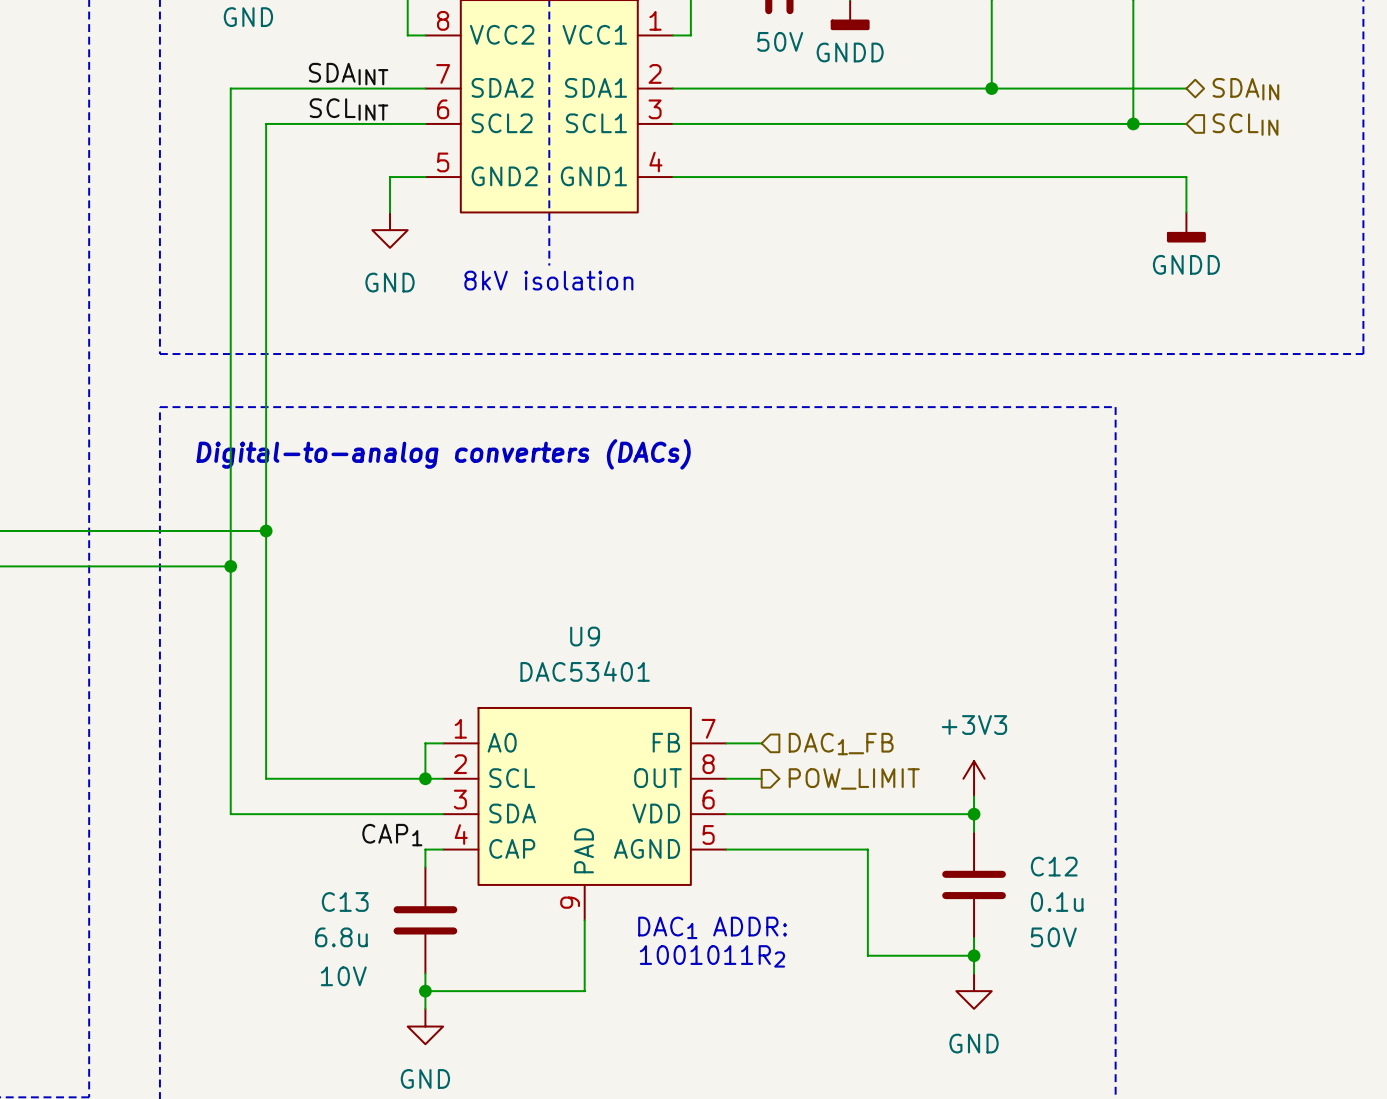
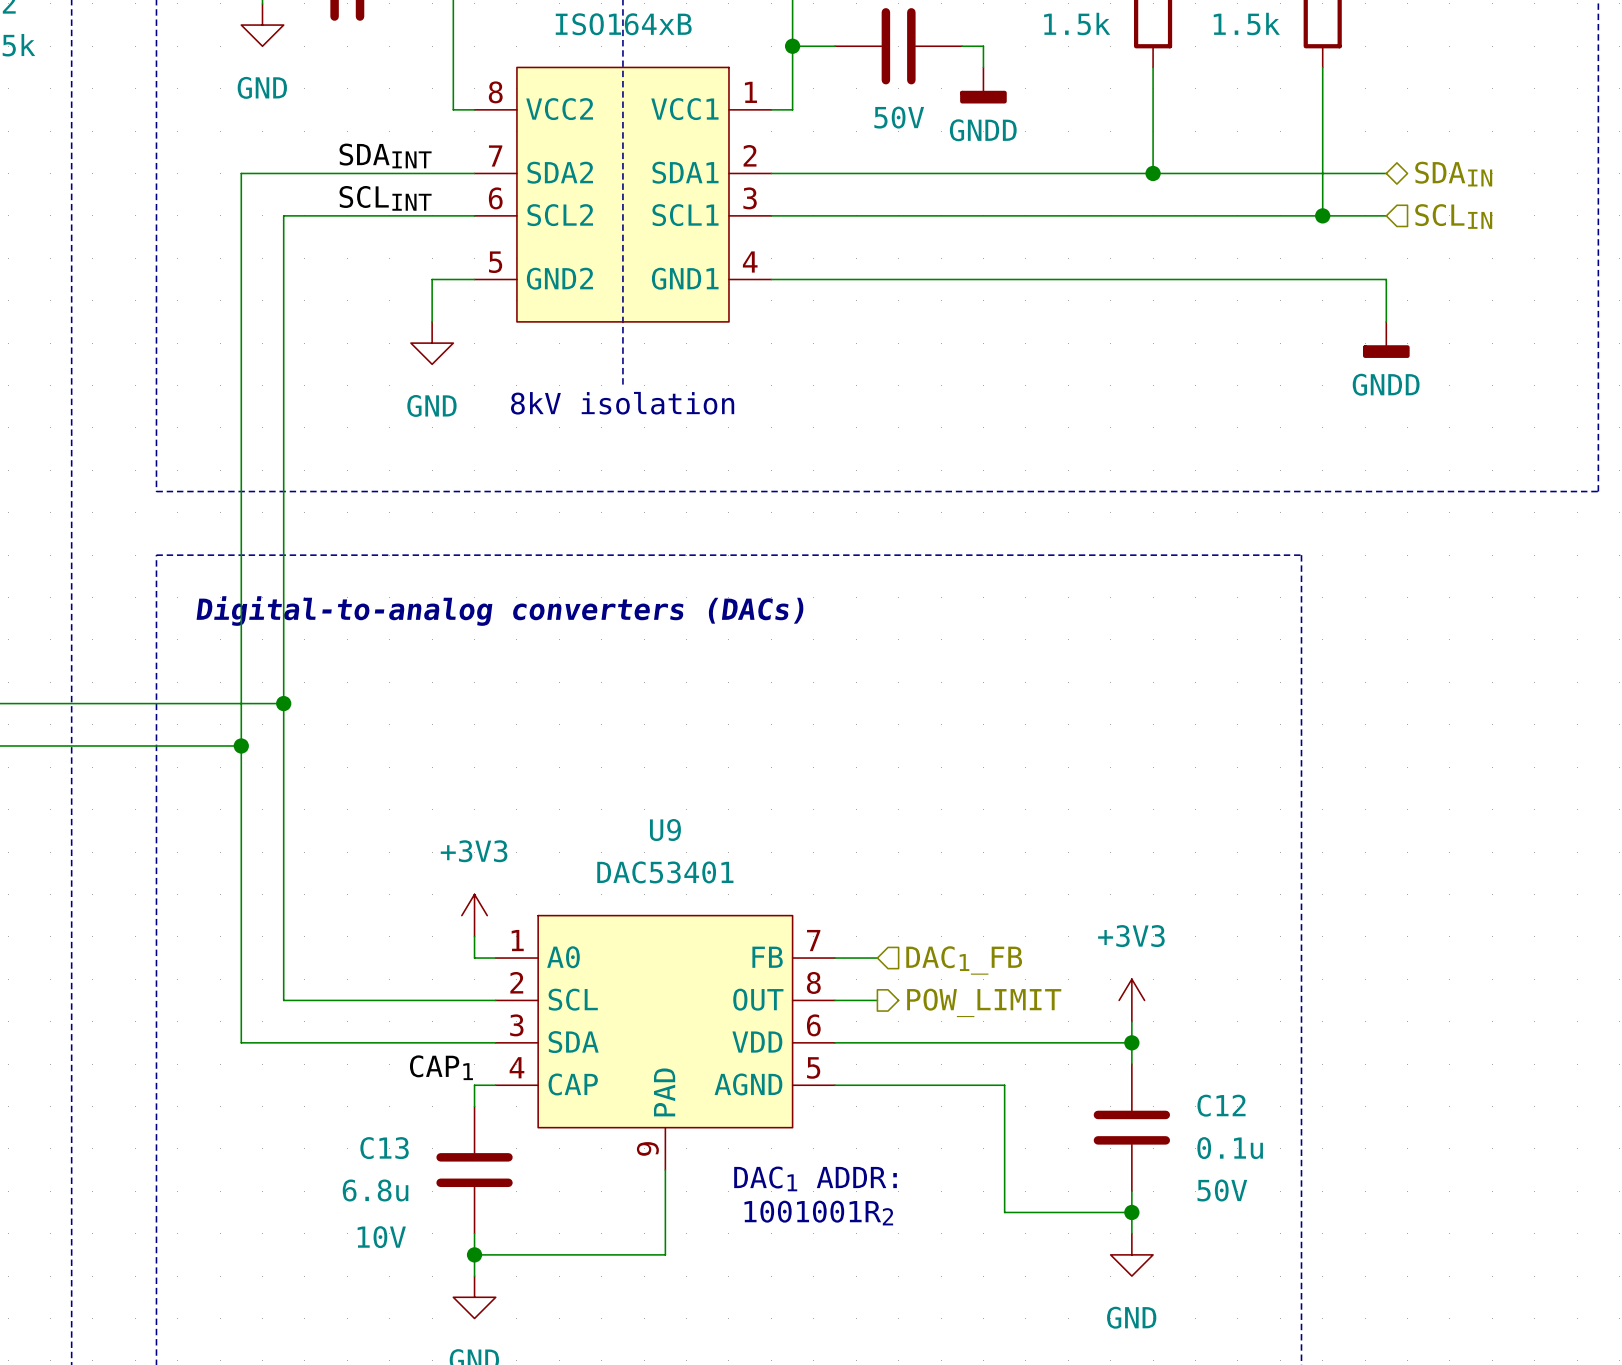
power symbol: none -> +3V3 (474, 915)
wire: (425, 743) (425, 778) -> (474, 958) (474, 936)
junction: (425, 778) -> none
text: 1001011R2 (712, 956) -> 1001001R2 (818, 1213)

